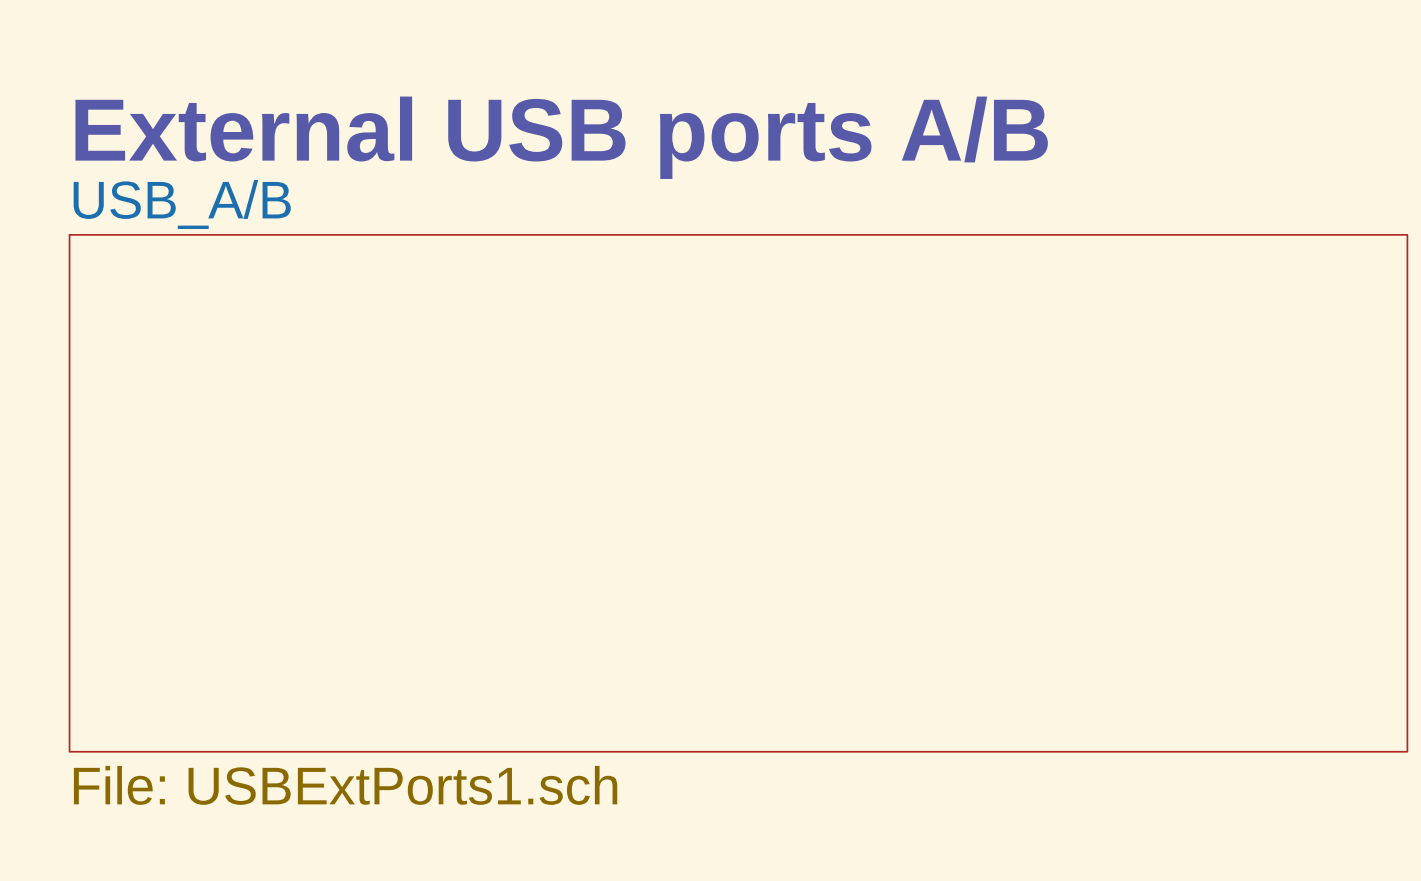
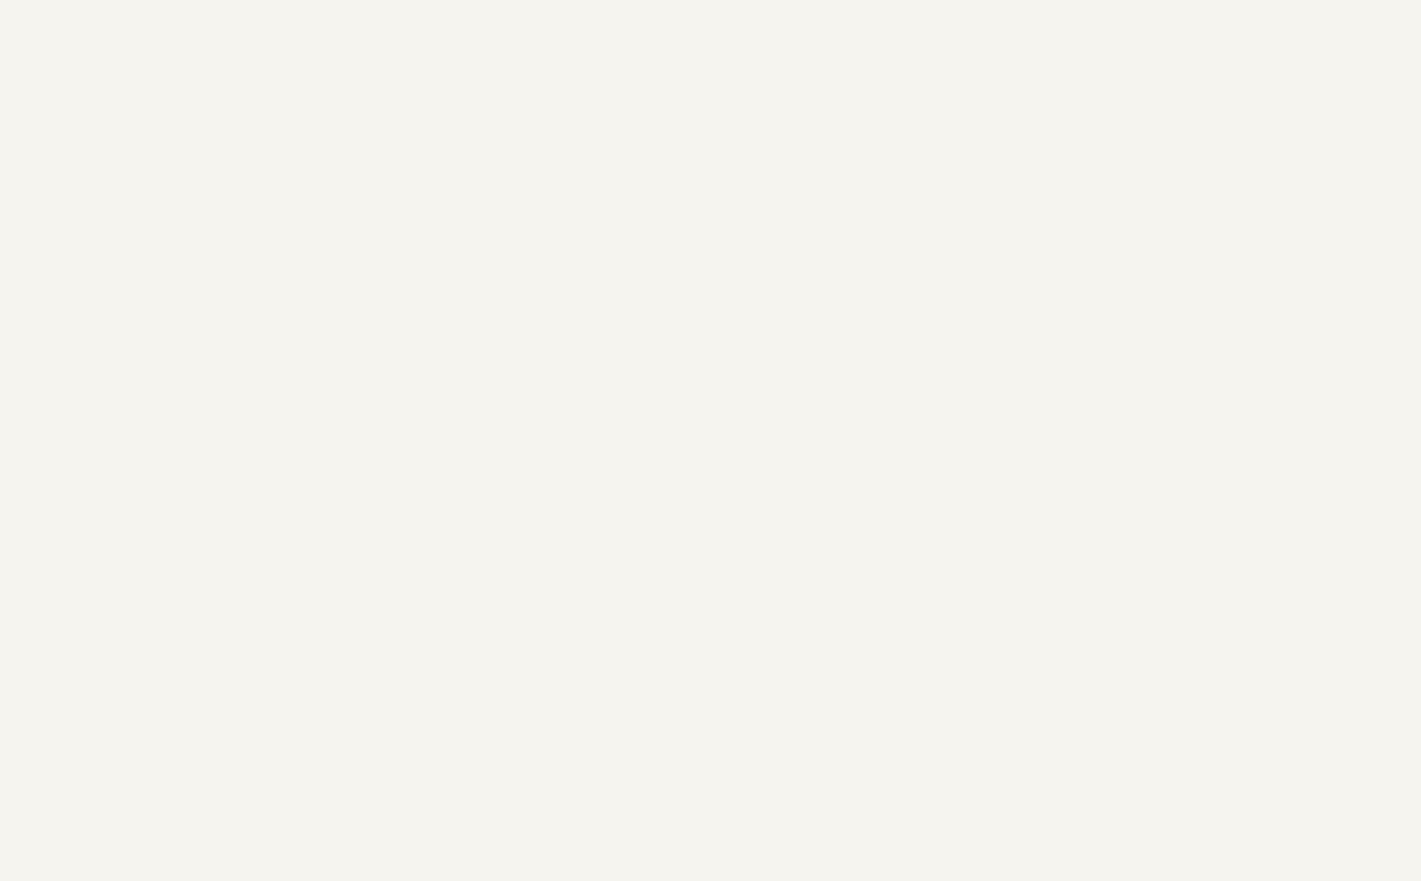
text: External USB ports A/B (561, 137) -> none
sheet USB_A/B: File: USBExtPorts1.sch (738, 493) -> none

